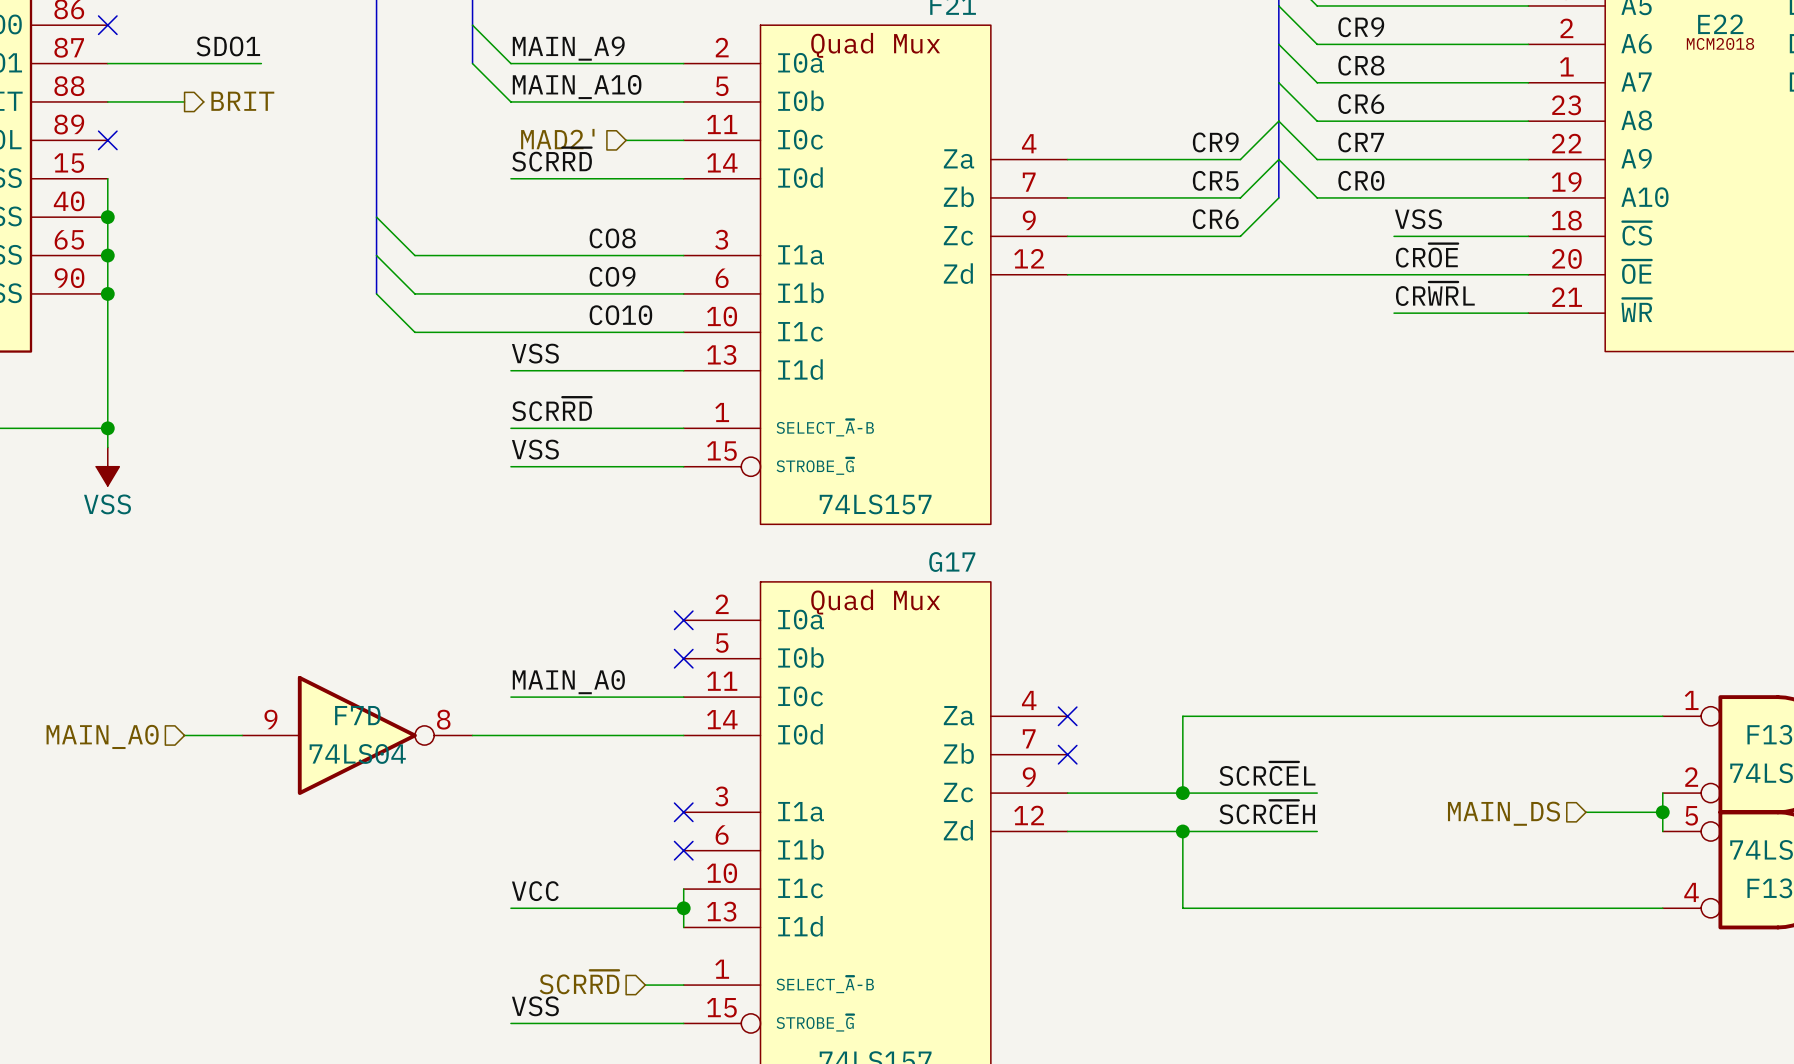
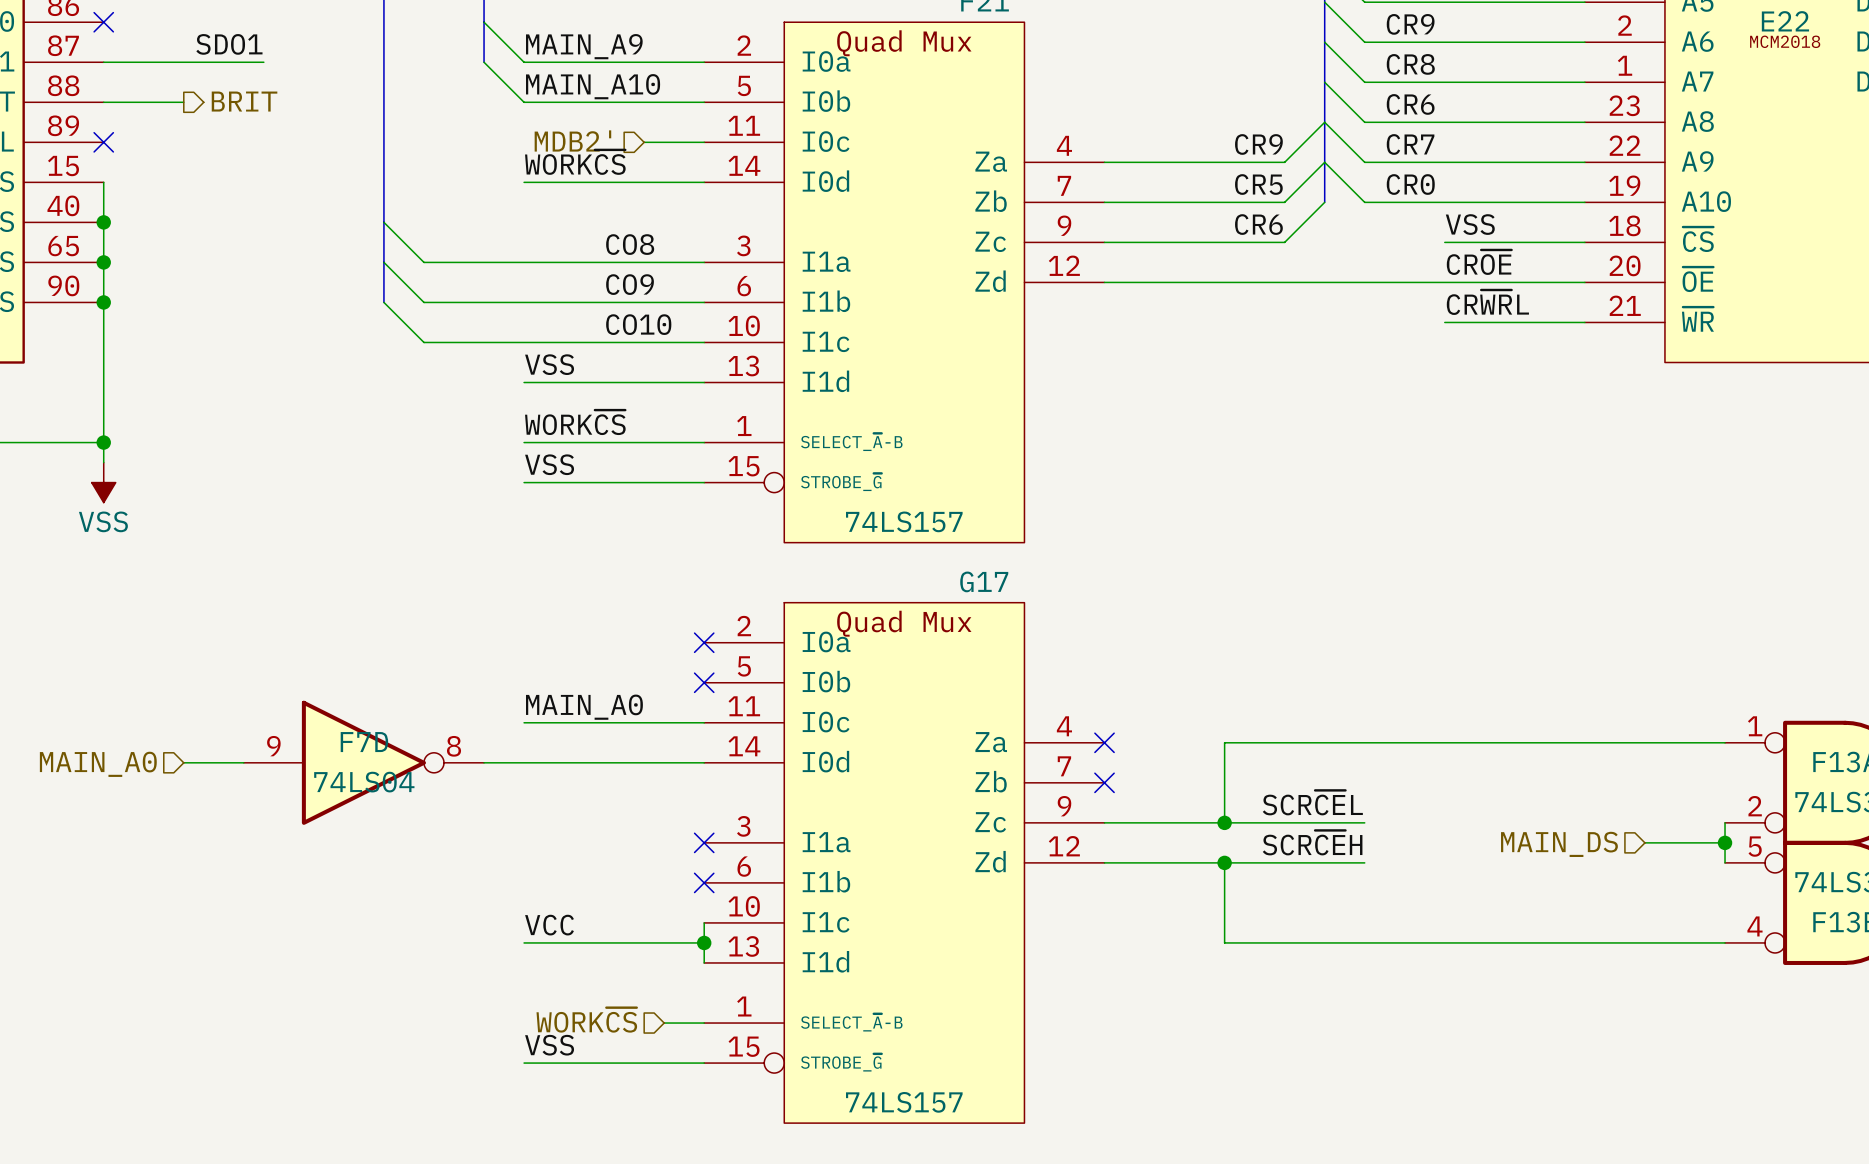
hierarchical label: MAD2' (557, 139) -> MDB2' (572, 140)
label: SCR~{RD} (552, 159) -> WORK~{CS} (575, 162)
label: SCR~{RD} (552, 409) -> WORK~{CS} (575, 422)
hierarchical label: SCR~{RD} (579, 982) -> WORK~{CS} (586, 1020)

